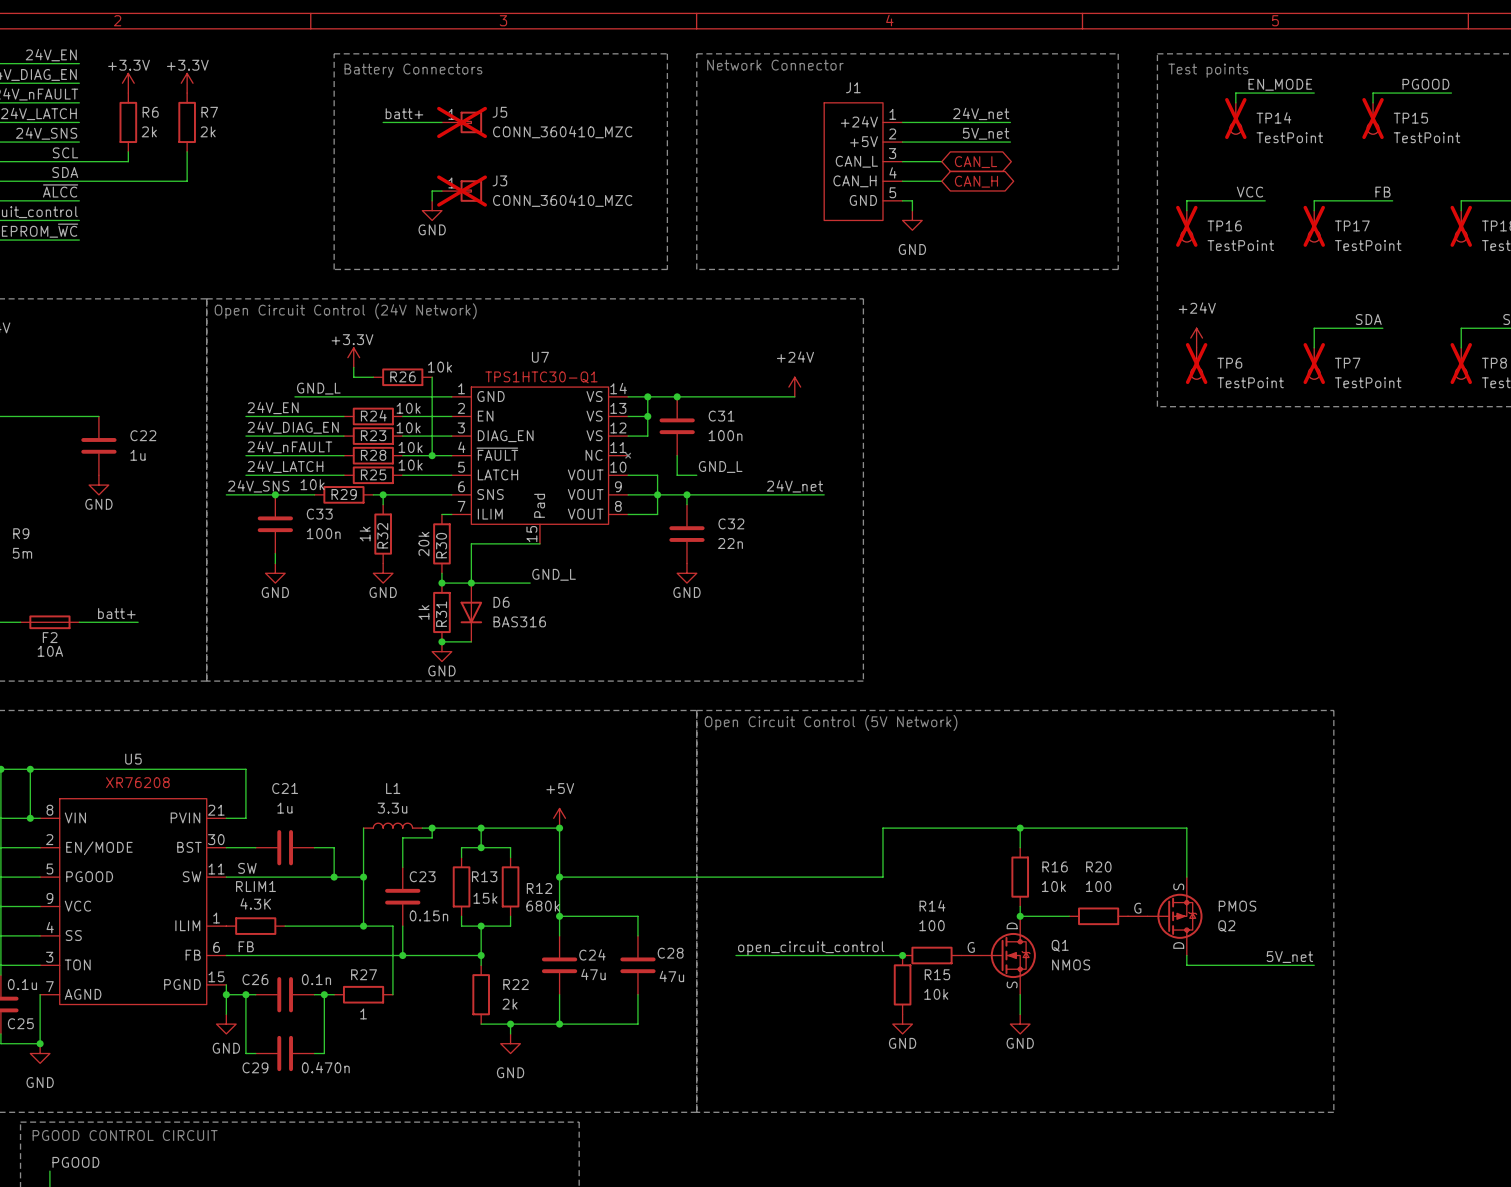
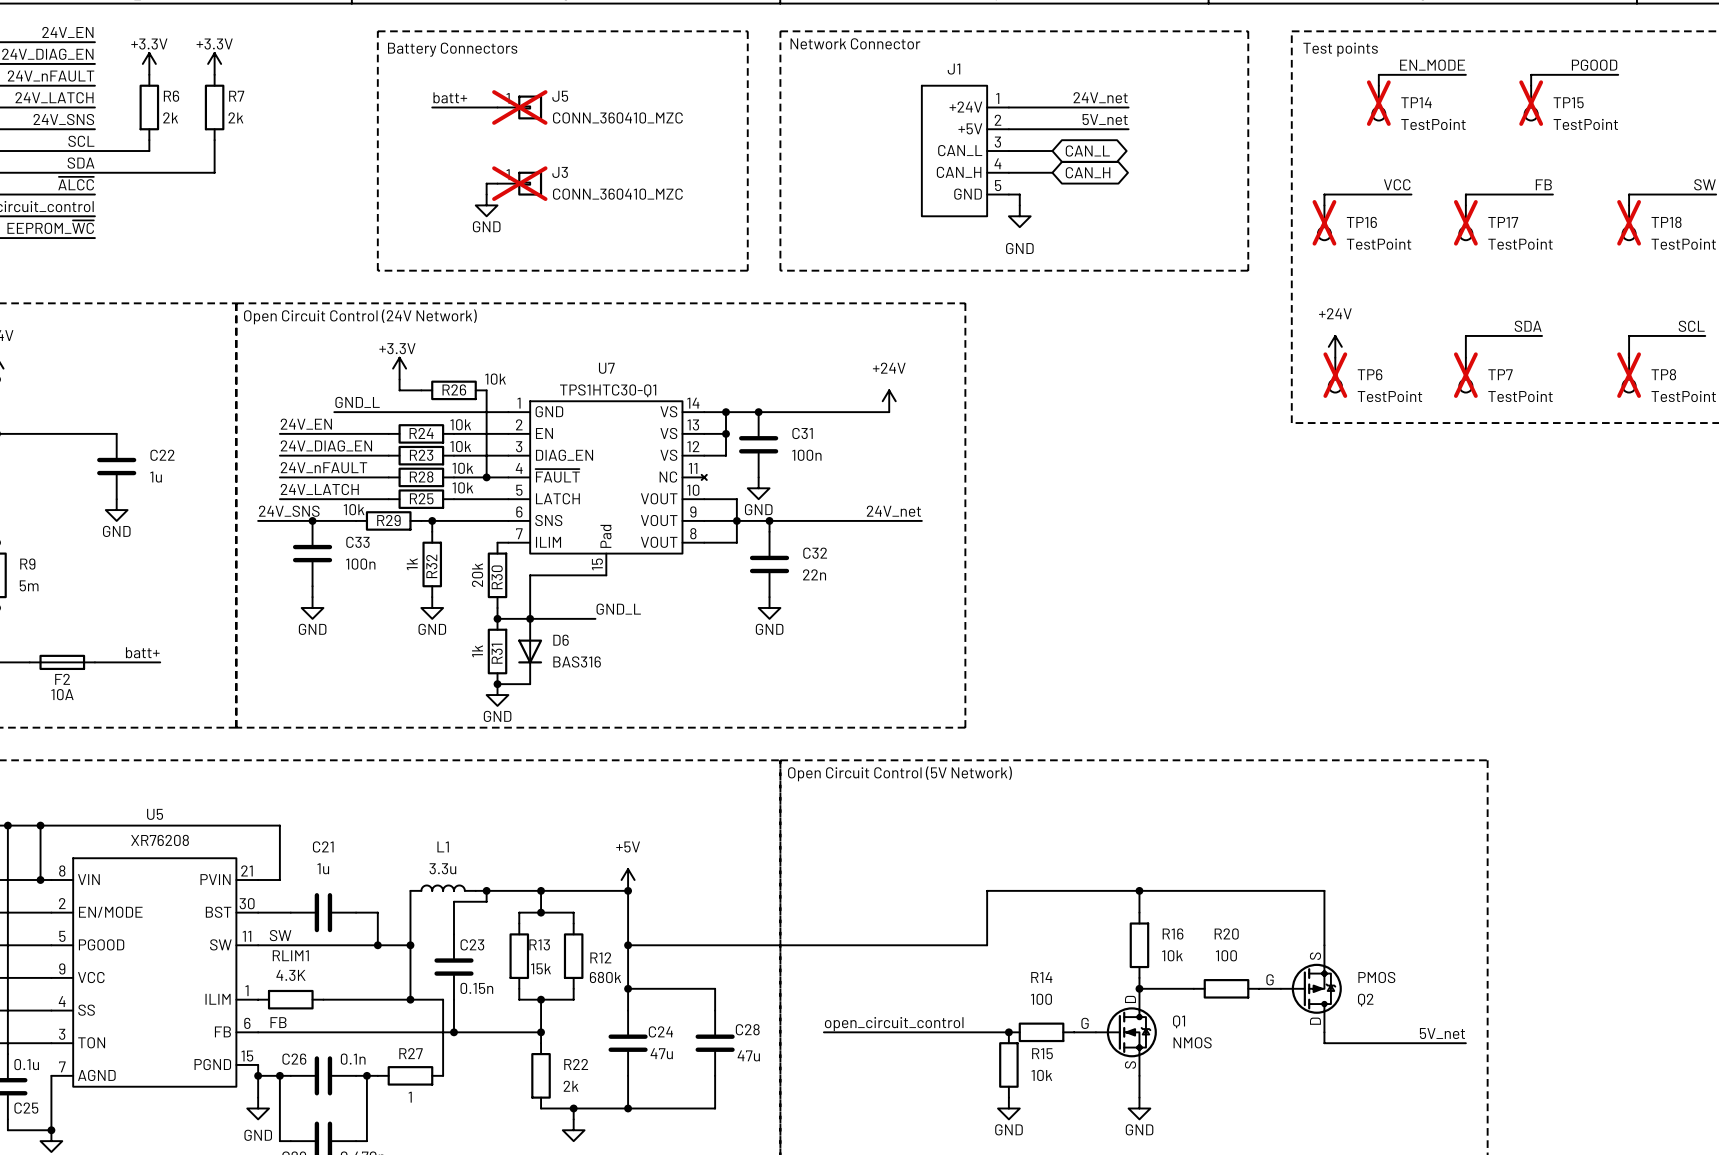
wire: (677, 455) (677, 475) (696, 475) -> none
power symbol: none -> GND (758, 488)
label: GND_L (720, 466) -> none

